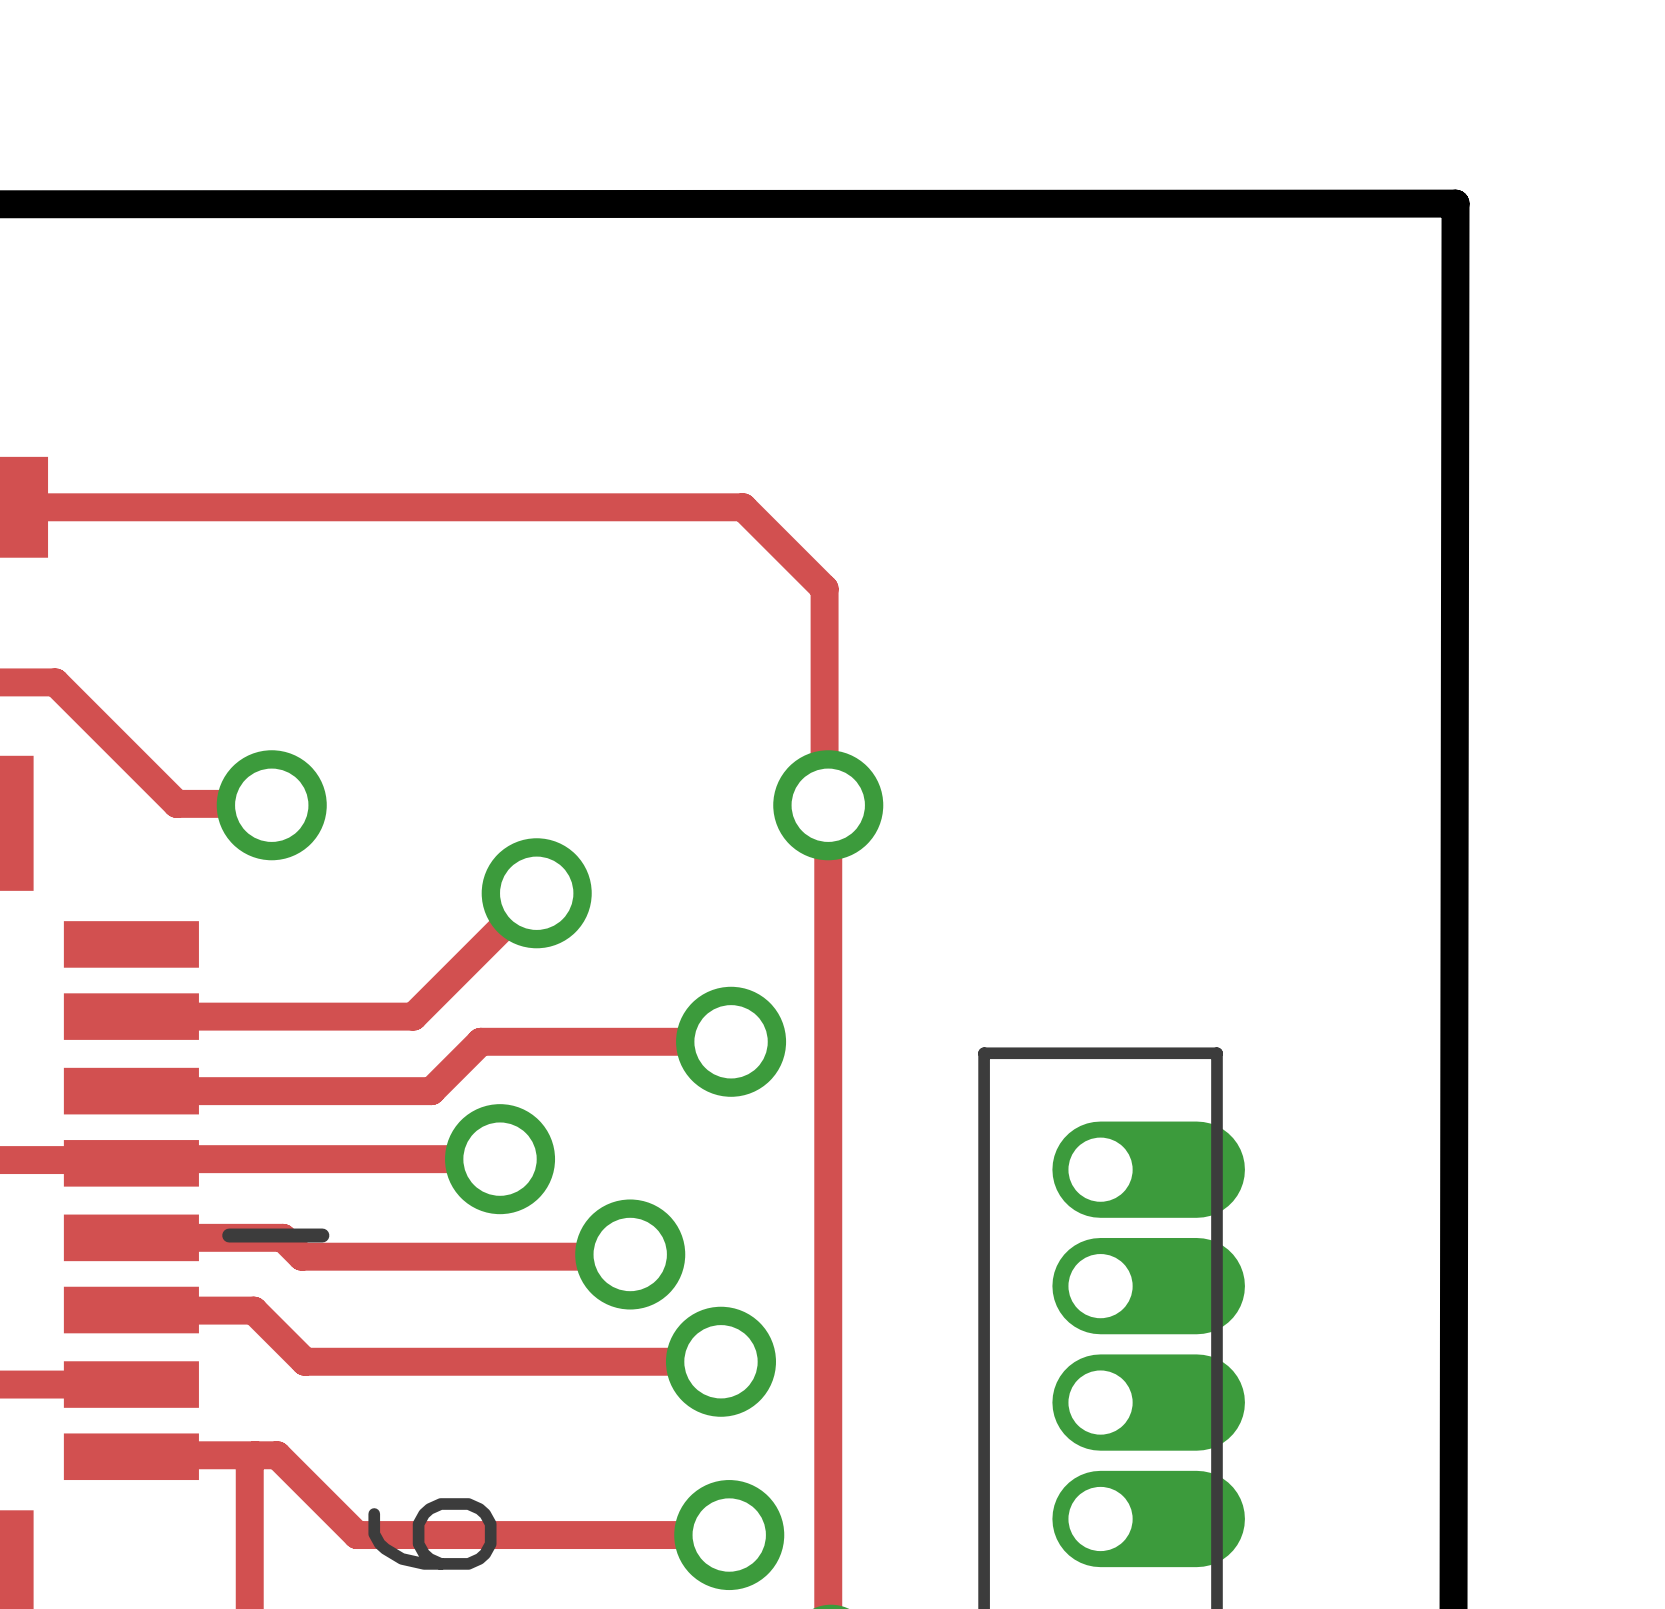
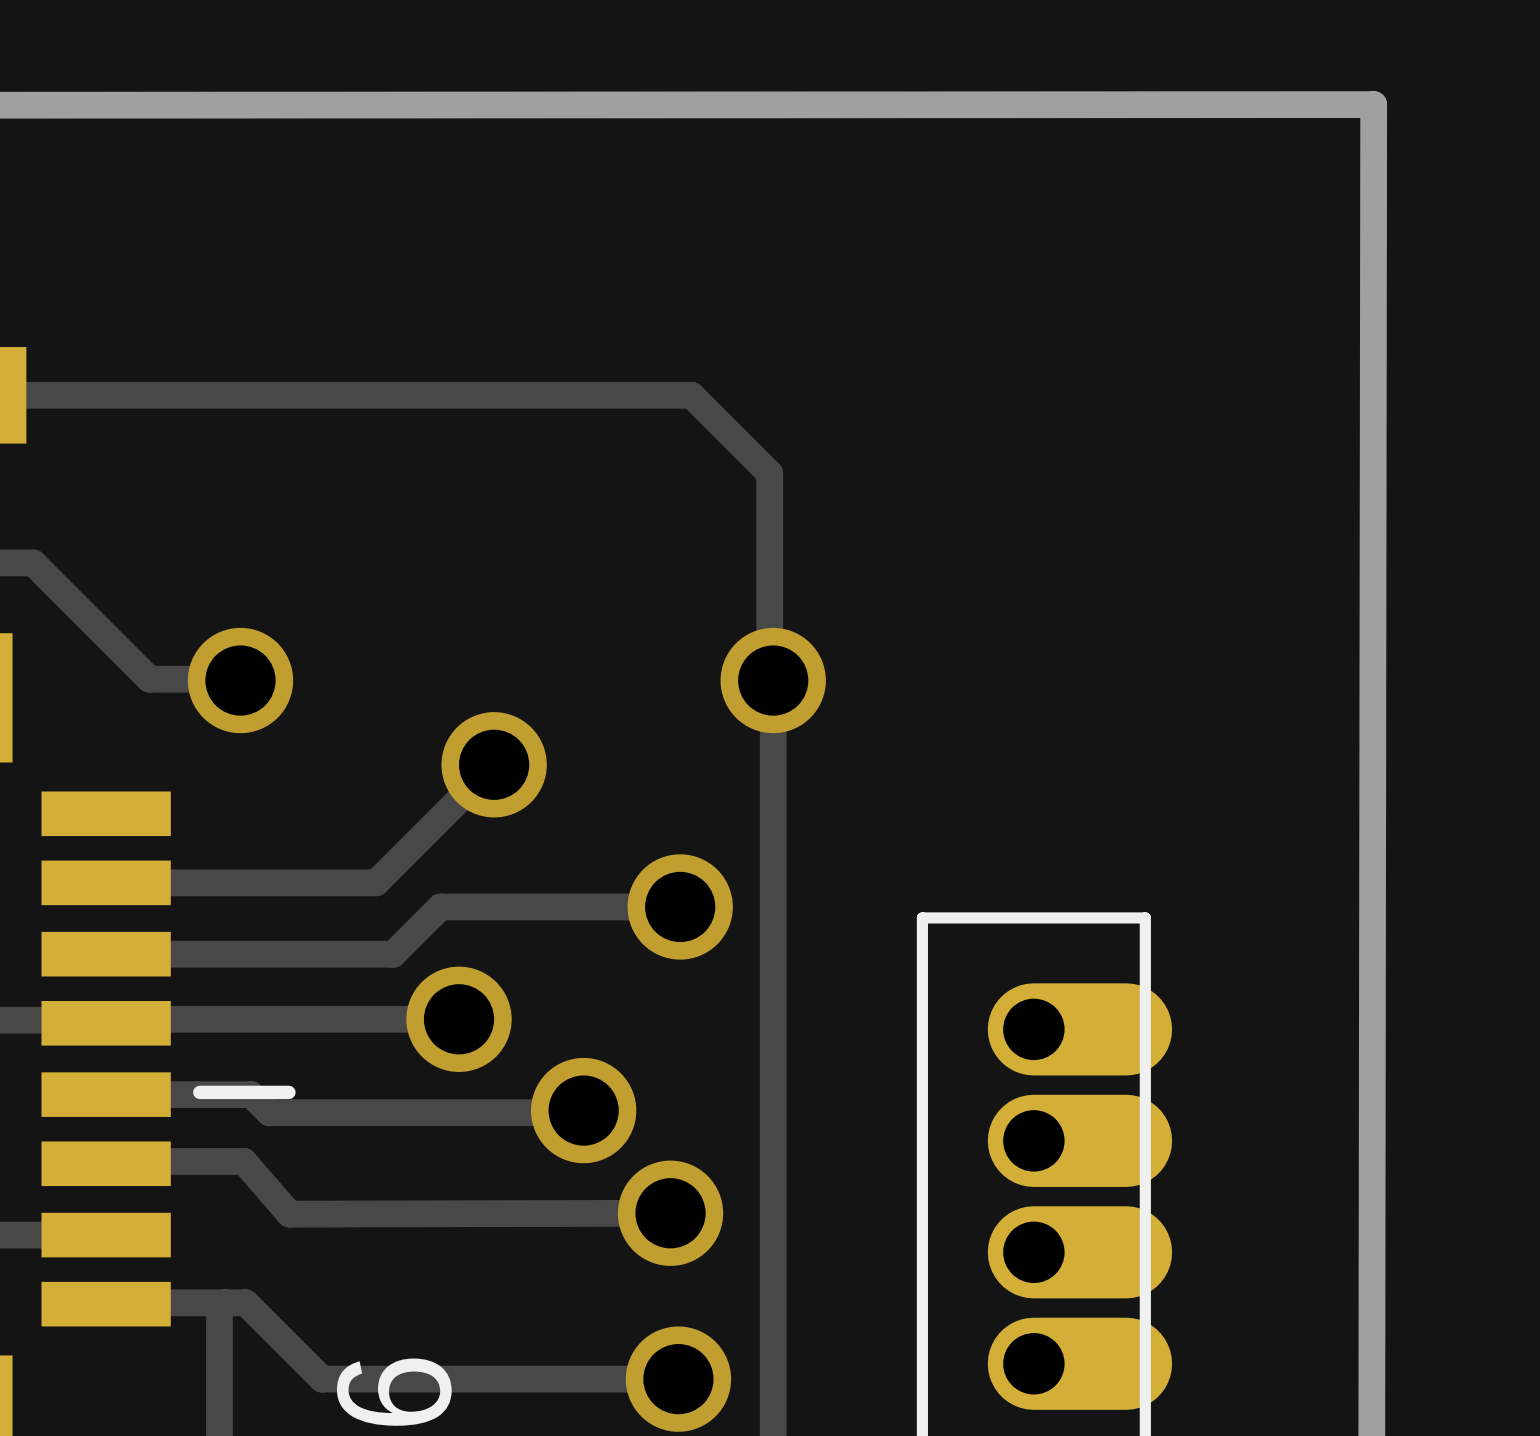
track: (131, 1310) (253, 1310) (304, 1361) (720, 1361) -> (108, 1161) (244, 1161) (289, 1214) (670, 1213)

